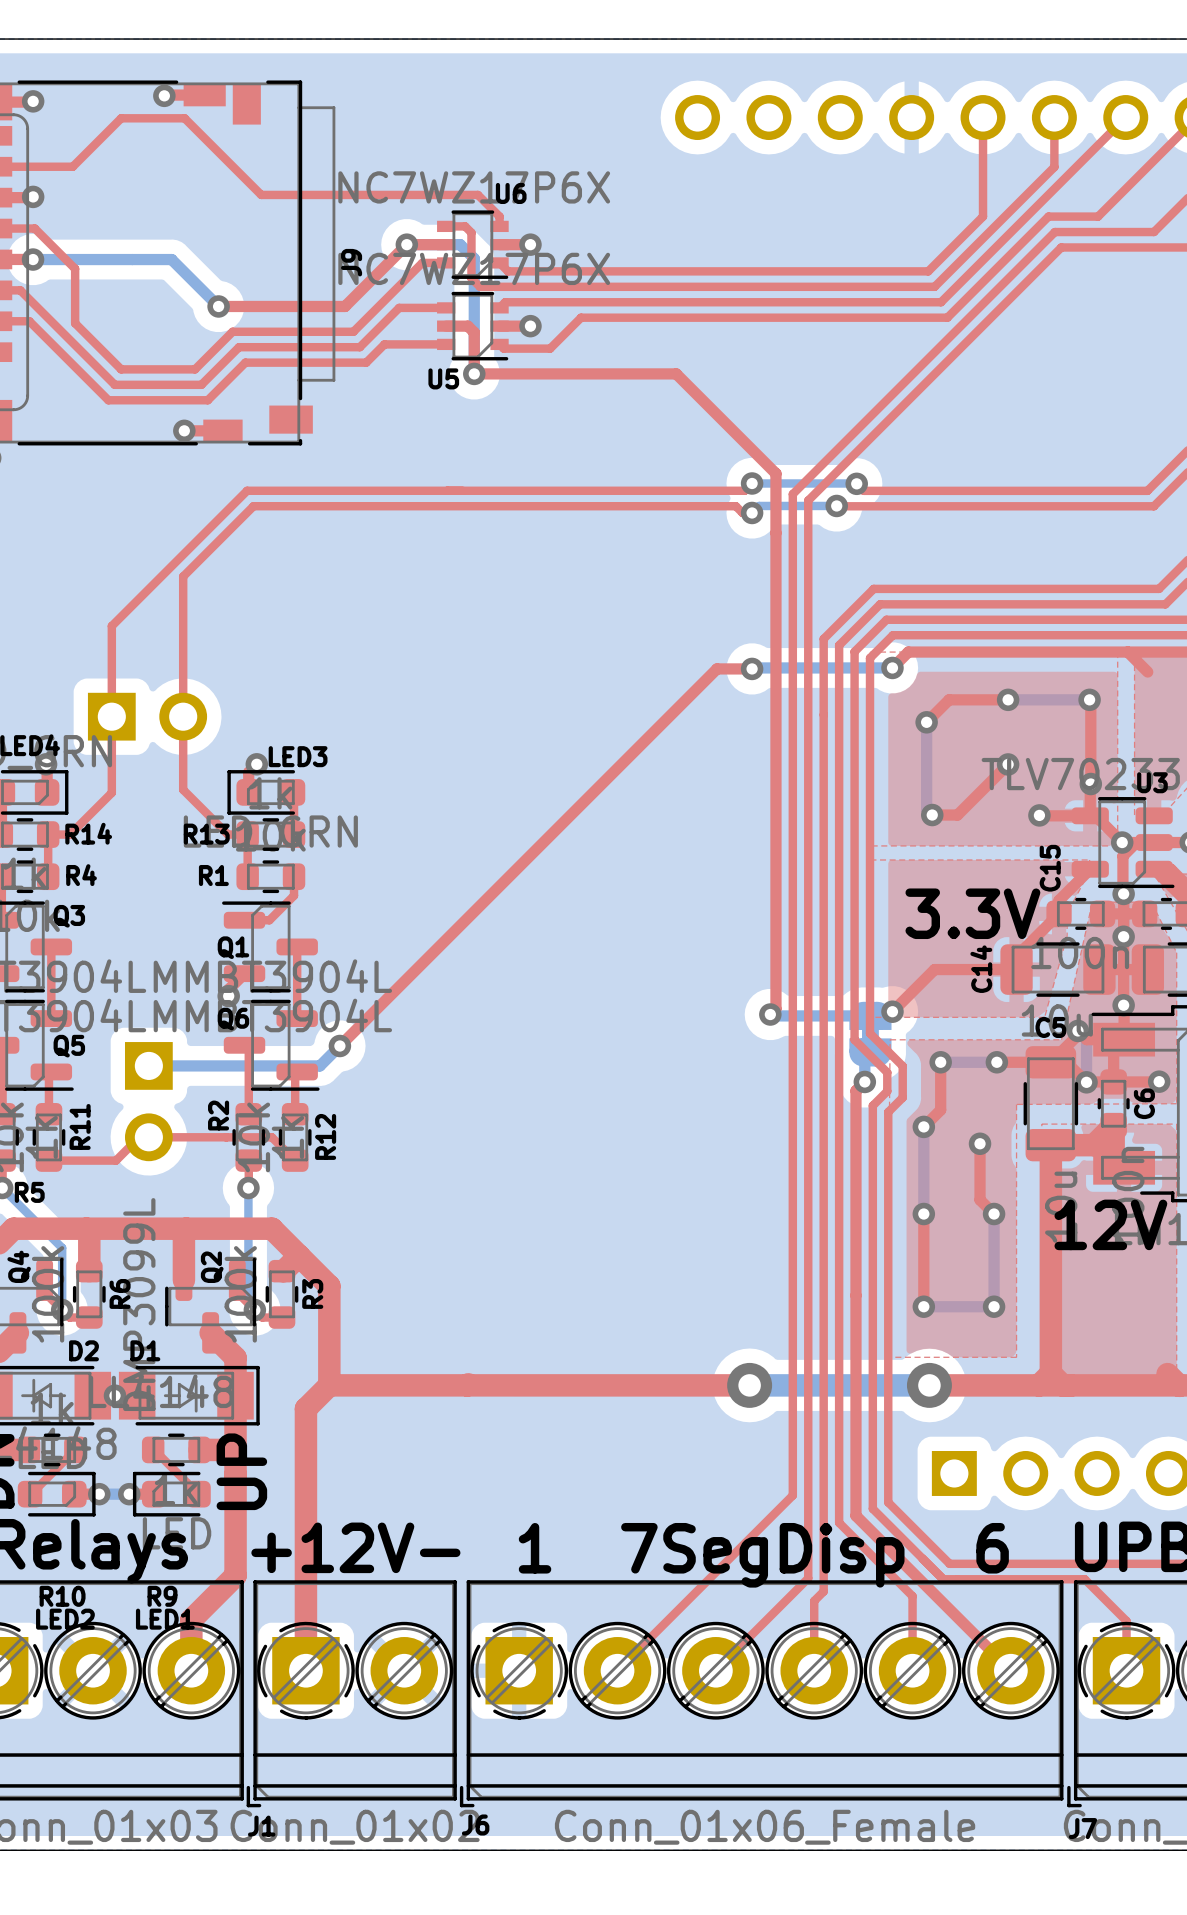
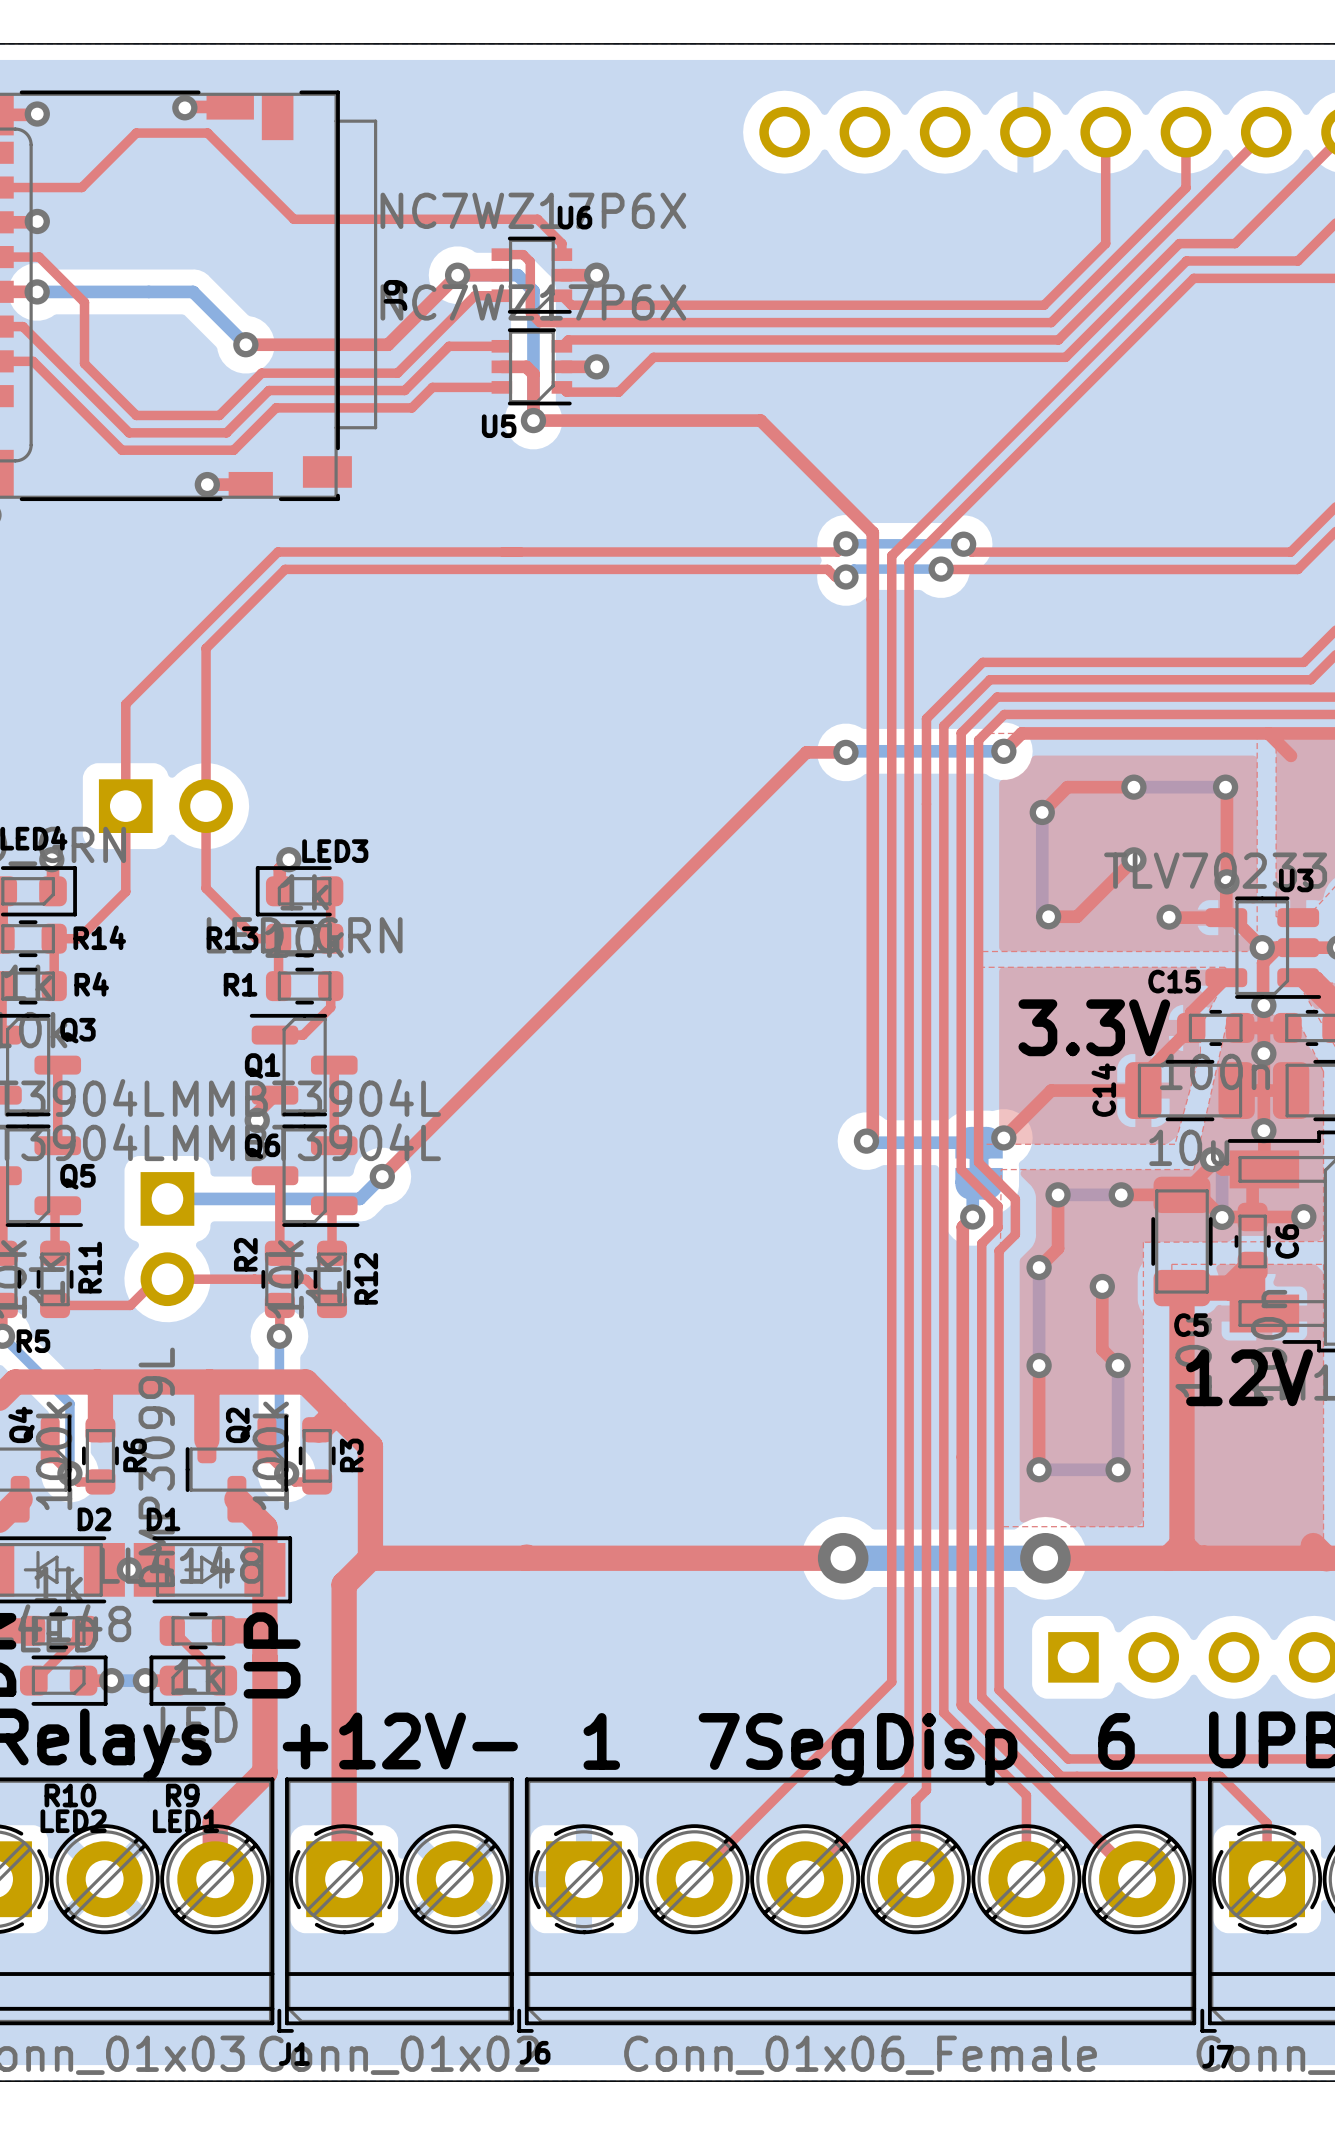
C15 name rotation: 0° (1050, 868) -> 90° clockwise (1174, 981)
C5 name position: C5 (1050, 1027) -> C5 (1191, 1325)

